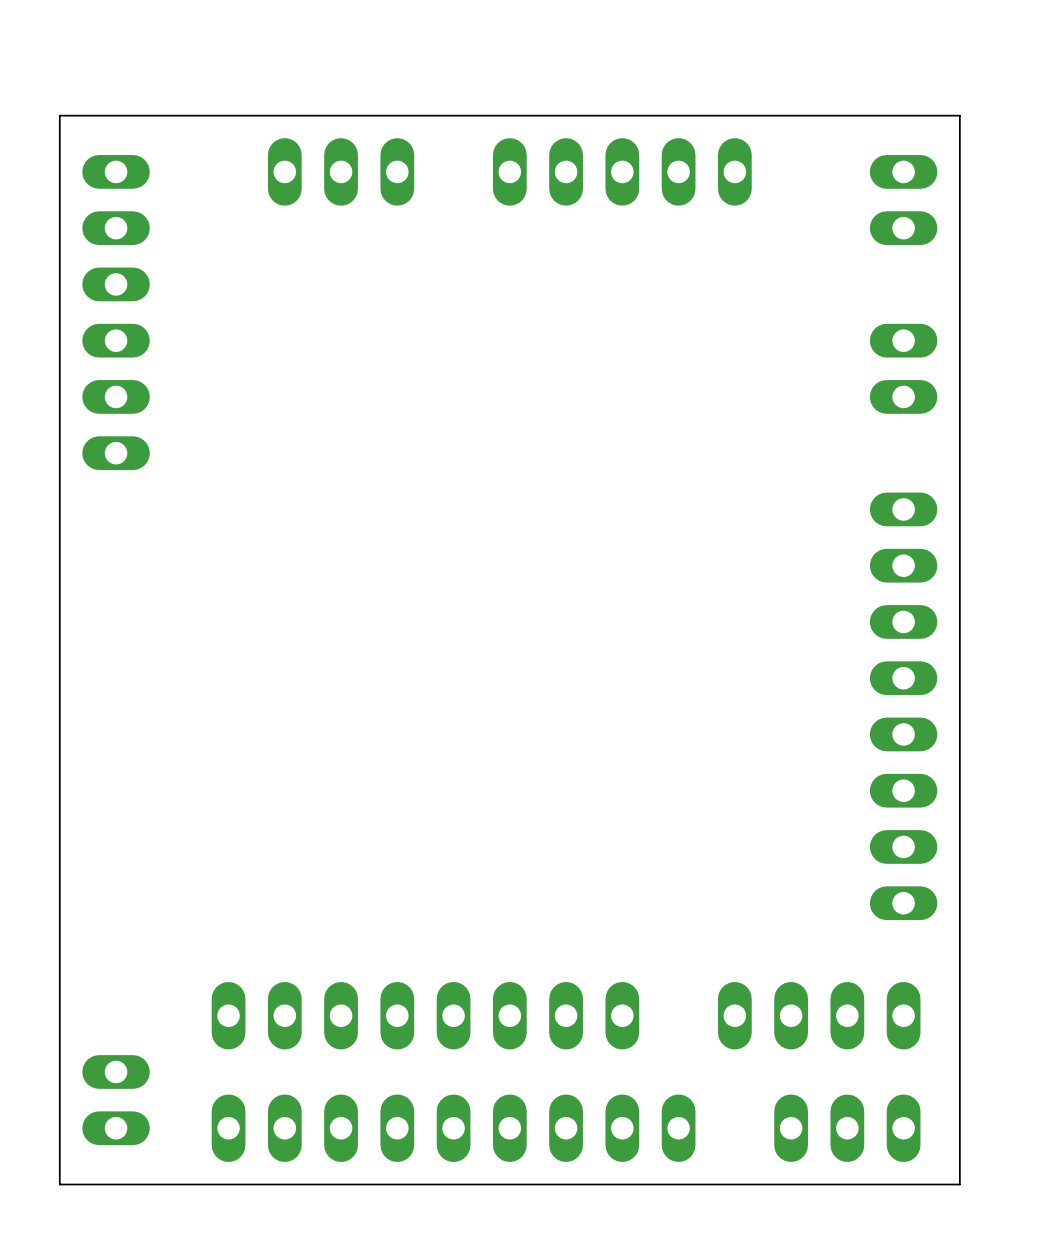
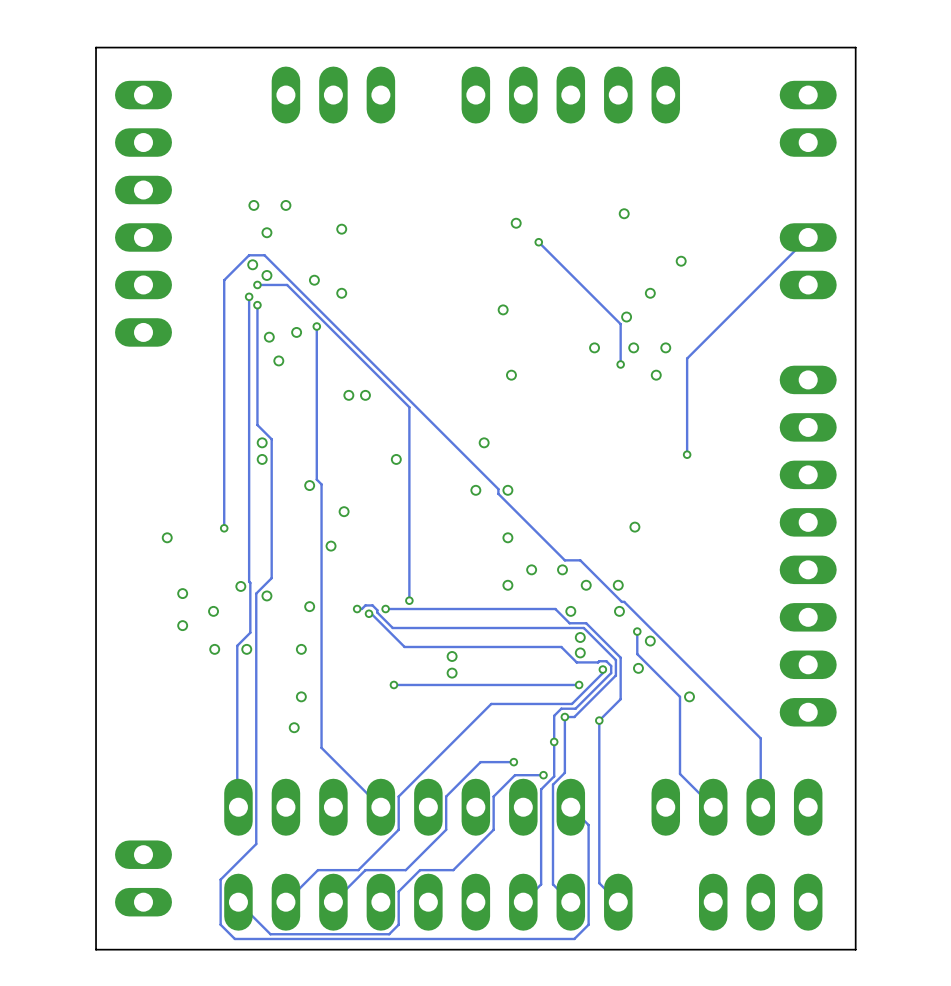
via: none -> (253, 205)
via: none -> (285, 205)
via: none -> (624, 213)
via: none -> (516, 223)
via: none -> (341, 229)
via: none -> (266, 232)
track: none -> (808, 237) (687, 358) (687, 454)
track: none -> (538, 242) (620, 324) (620, 364)
via: none -> (538, 242)
via: none -> (681, 261)
via: none -> (252, 264)
via: none -> (266, 275)
via: none -> (314, 280)
track: none -> (257, 284) (287, 284) (409, 407) (409, 600)
via: none -> (257, 284)
via: none -> (341, 293)
via: none -> (650, 293)
track: none -> (249, 296) (250, 632) (237, 645) (238, 807)
via: none -> (249, 296)
track: none -> (257, 305) (257, 425) (271, 439) (271, 578) (256, 593) (256, 844) (220, 879) (220, 924) (234, 938) (574, 938) (588, 924) (588, 825) (570, 807)
via: none -> (257, 305)
via: none -> (503, 309)
via: none -> (626, 317)
track: none -> (316, 326) (316, 479) (321, 484) (321, 747) (380, 807)
via: none -> (316, 326)
via: none -> (296, 332)
via: none -> (269, 337)
via: none -> (594, 347)
via: none -> (633, 347)
via: none -> (665, 347)
via: none -> (278, 360)
via: none -> (620, 364)
via: none -> (511, 375)
via: none -> (656, 375)
via: none -> (348, 395)
via: none -> (365, 395)
via: none -> (262, 442)
via: none -> (484, 442)
via: none -> (687, 454)
via: none -> (262, 459)
via: none -> (396, 459)
via: none -> (309, 485)
via: none -> (475, 490)
via: none -> (507, 490)
via: none -> (344, 511)
via: none -> (634, 527)
track: none -> (224, 528) (224, 280) (249, 255) (264, 255) (498, 489) (498, 493) (564, 560) (580, 560) (760, 738) (760, 807)
via: none -> (224, 528)
via: none -> (167, 537)
via: none -> (507, 537)
via: none -> (331, 546)
via: none -> (531, 569)
via: none -> (562, 569)
via: none -> (507, 585)
via: none -> (586, 585)
via: none -> (618, 585)
via: none -> (240, 586)
via: none -> (182, 593)
via: none -> (266, 595)
via: none -> (409, 600)
via: none -> (309, 606)
track: none -> (357, 609) (361, 609) (365, 605) (372, 605) (392, 628) (583, 628) (615, 660) (615, 675) (574, 717) (564, 717) (564, 772) (553, 784) (553, 884) (570, 902)
via: none -> (357, 609)
track: none -> (385, 609) (555, 609) (569, 623) (586, 623) (620, 657) (620, 699) (599, 720) (599, 883) (618, 902)
via: none -> (385, 609)
via: none -> (213, 611)
via: none -> (570, 611)
via: none -> (619, 611)
track: none -> (369, 613) (371, 613) (404, 646) (561, 646) (576, 662) (606, 661) (611, 665) (611, 673) (575, 708) (561, 708) (554, 715) (554, 776) (541, 789) (541, 884) (523, 902)
via: none -> (369, 613)
via: none -> (182, 625)
track: none -> (637, 631) (637, 654) (680, 696) (680, 773) (713, 807)
via: none -> (637, 631)
via: none -> (580, 637)
via: none -> (650, 641)
via: none -> (214, 649)
via: none -> (246, 649)
via: none -> (301, 649)
via: none -> (580, 652)
via: none -> (452, 656)
via: none -> (638, 668)
track: none -> (602, 669) (602, 673) (571, 703) (491, 703) (398, 796) (398, 829) (358, 870) (317, 870) (285, 902)
via: none -> (602, 669)
via: none -> (452, 673)
via: none -> (393, 684)
track: none -> (579, 684) (393, 684)
via: none -> (579, 684)
via: none -> (301, 696)
via: none -> (689, 696)
via: none -> (564, 717)
via: none -> (599, 720)
via: none -> (294, 727)
via: none -> (554, 741)
track: none -> (513, 762) (480, 762) (446, 796) (446, 829) (405, 870) (365, 870) (333, 902)
via: none -> (513, 762)
track: none -> (543, 775) (515, 775) (493, 796) (493, 829) (453, 870) (420, 870) (398, 891) (398, 924) (389, 934) (270, 934) (238, 902)
via: none -> (543, 775)

